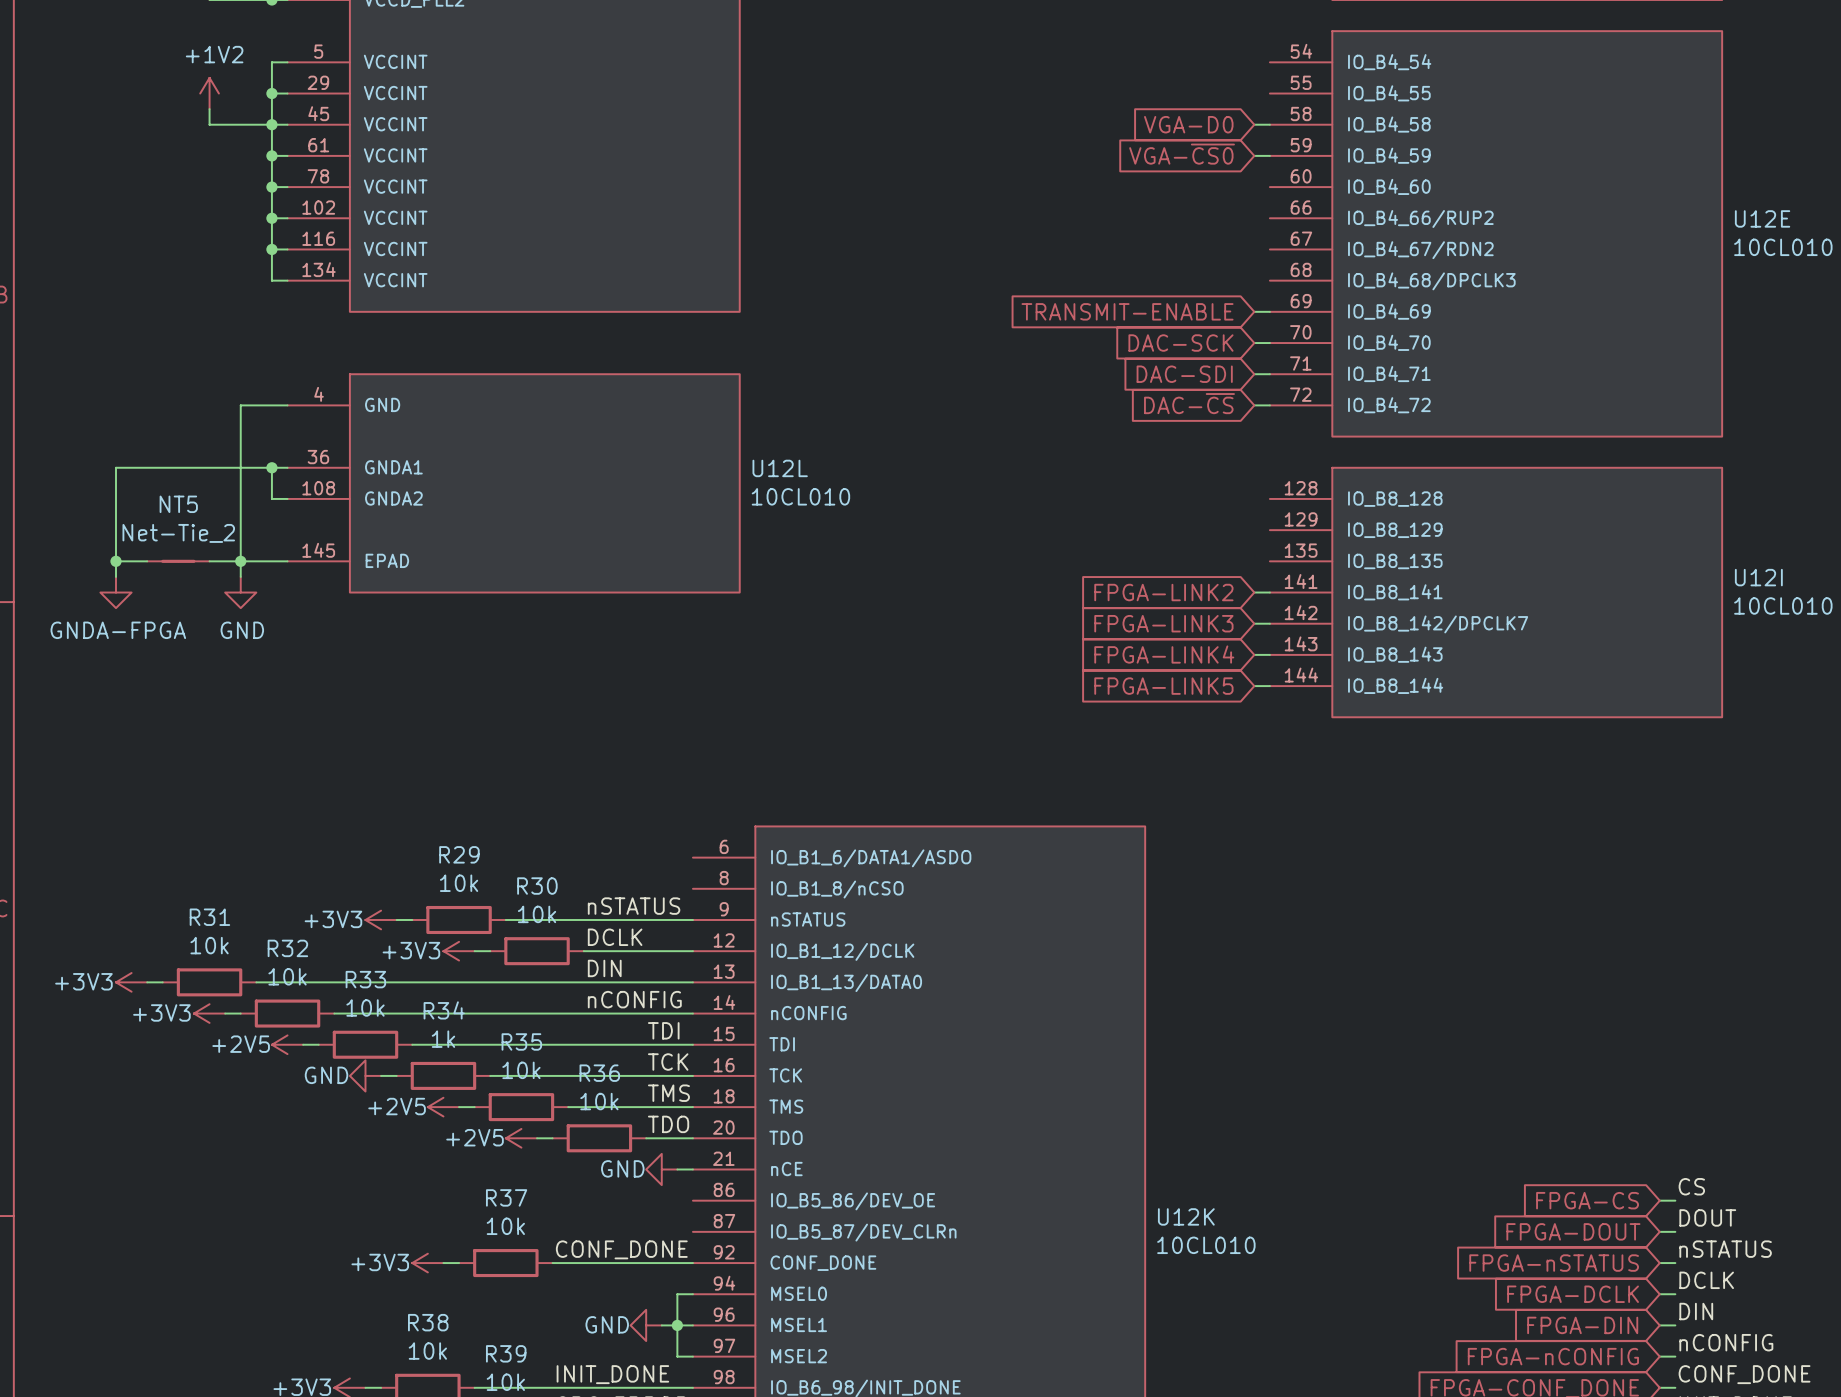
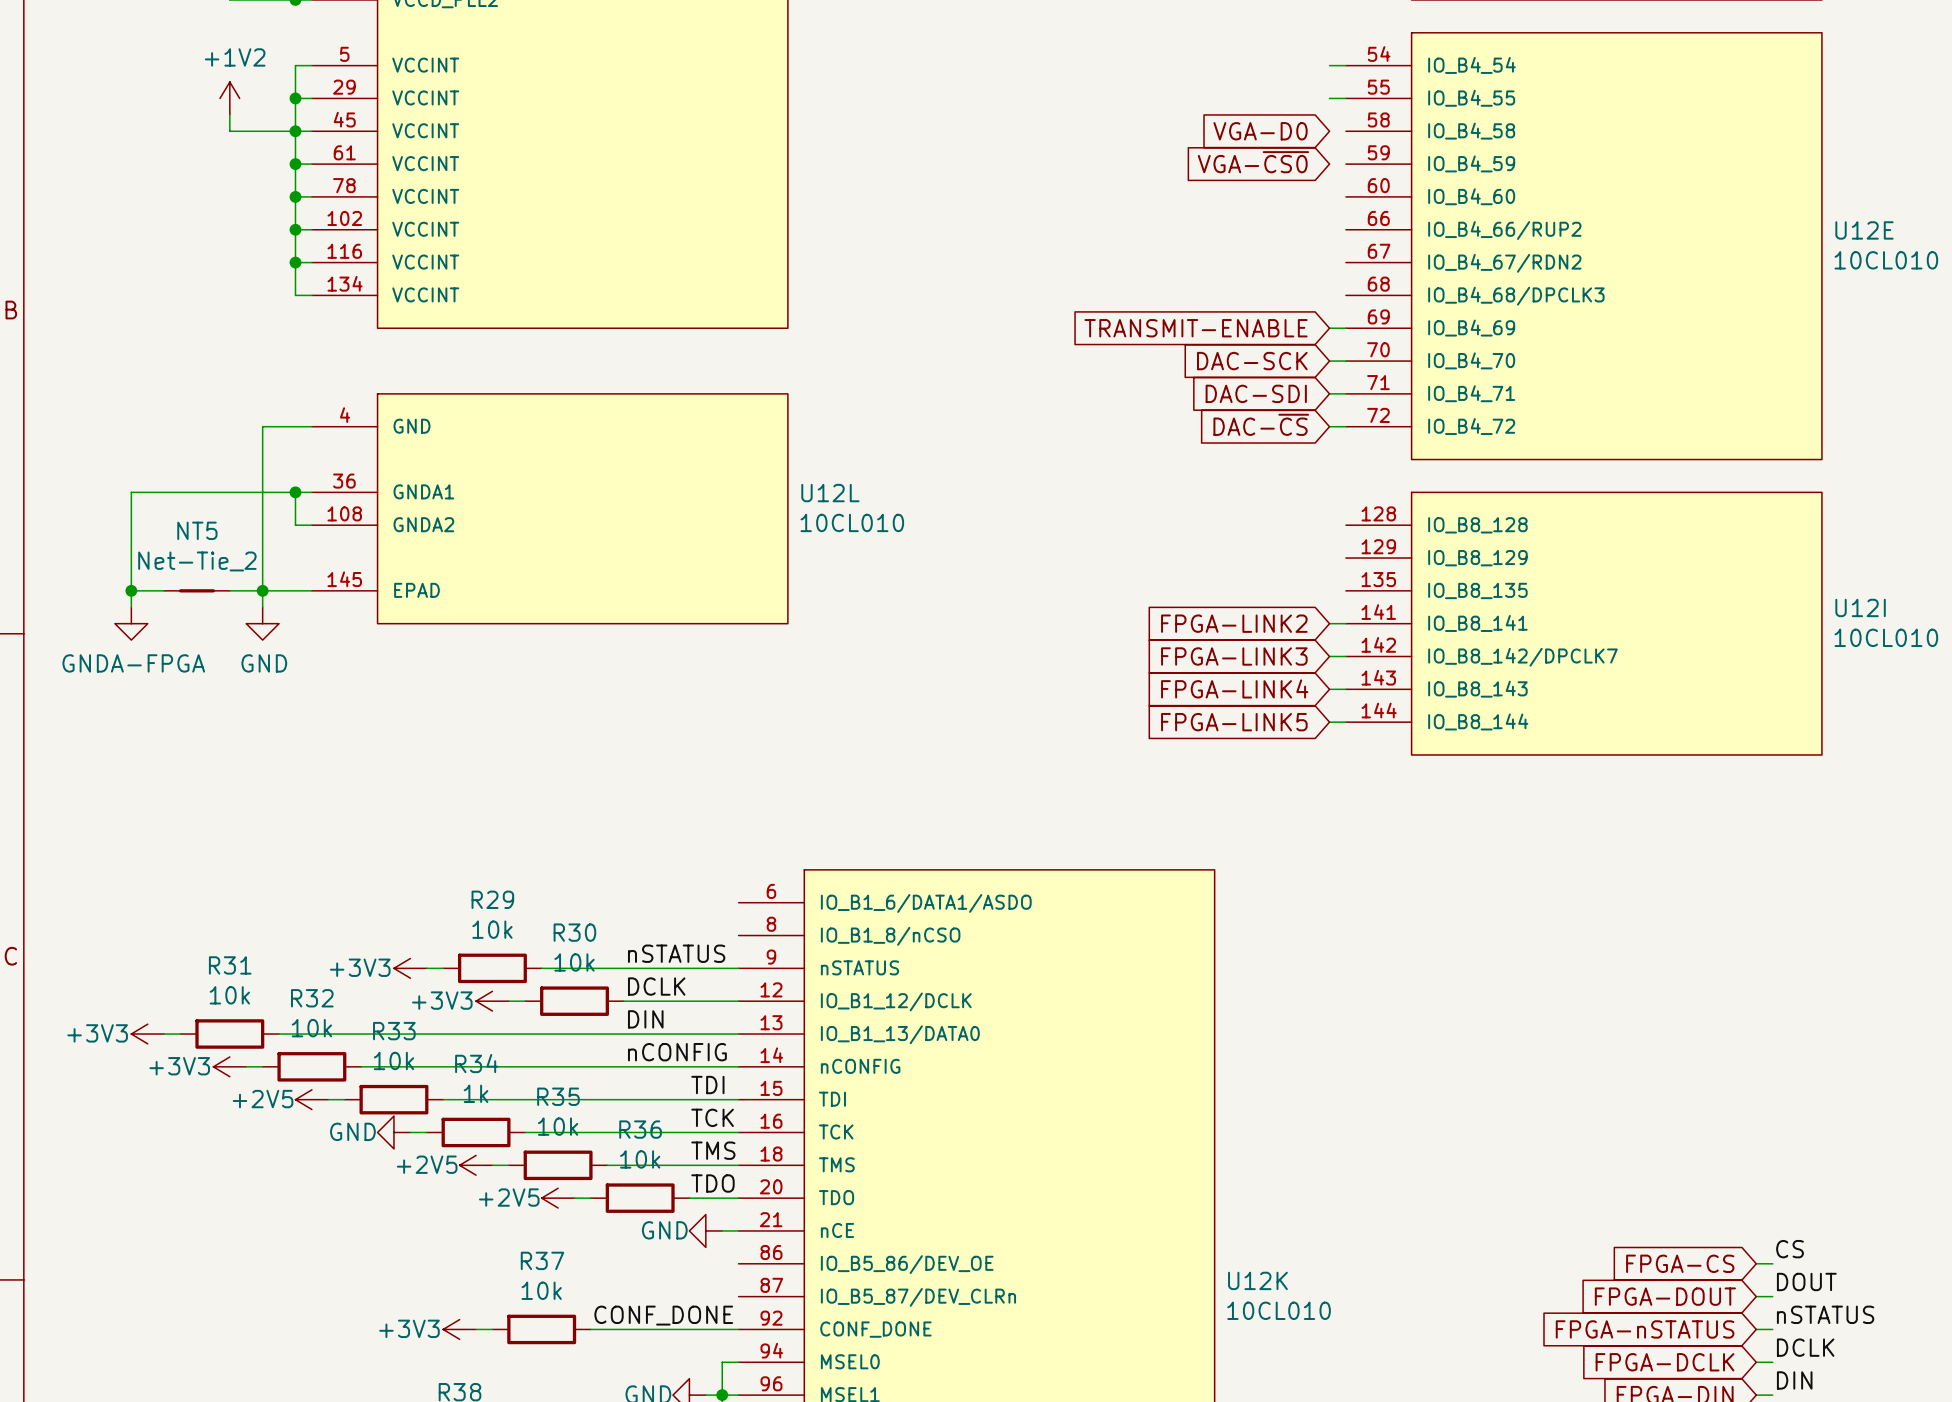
wire: (1254, 124) (1269, 124) -> (1329, 65) (1345, 65)
wire: (1254, 155) (1269, 155) -> (1329, 98) (1345, 98)

